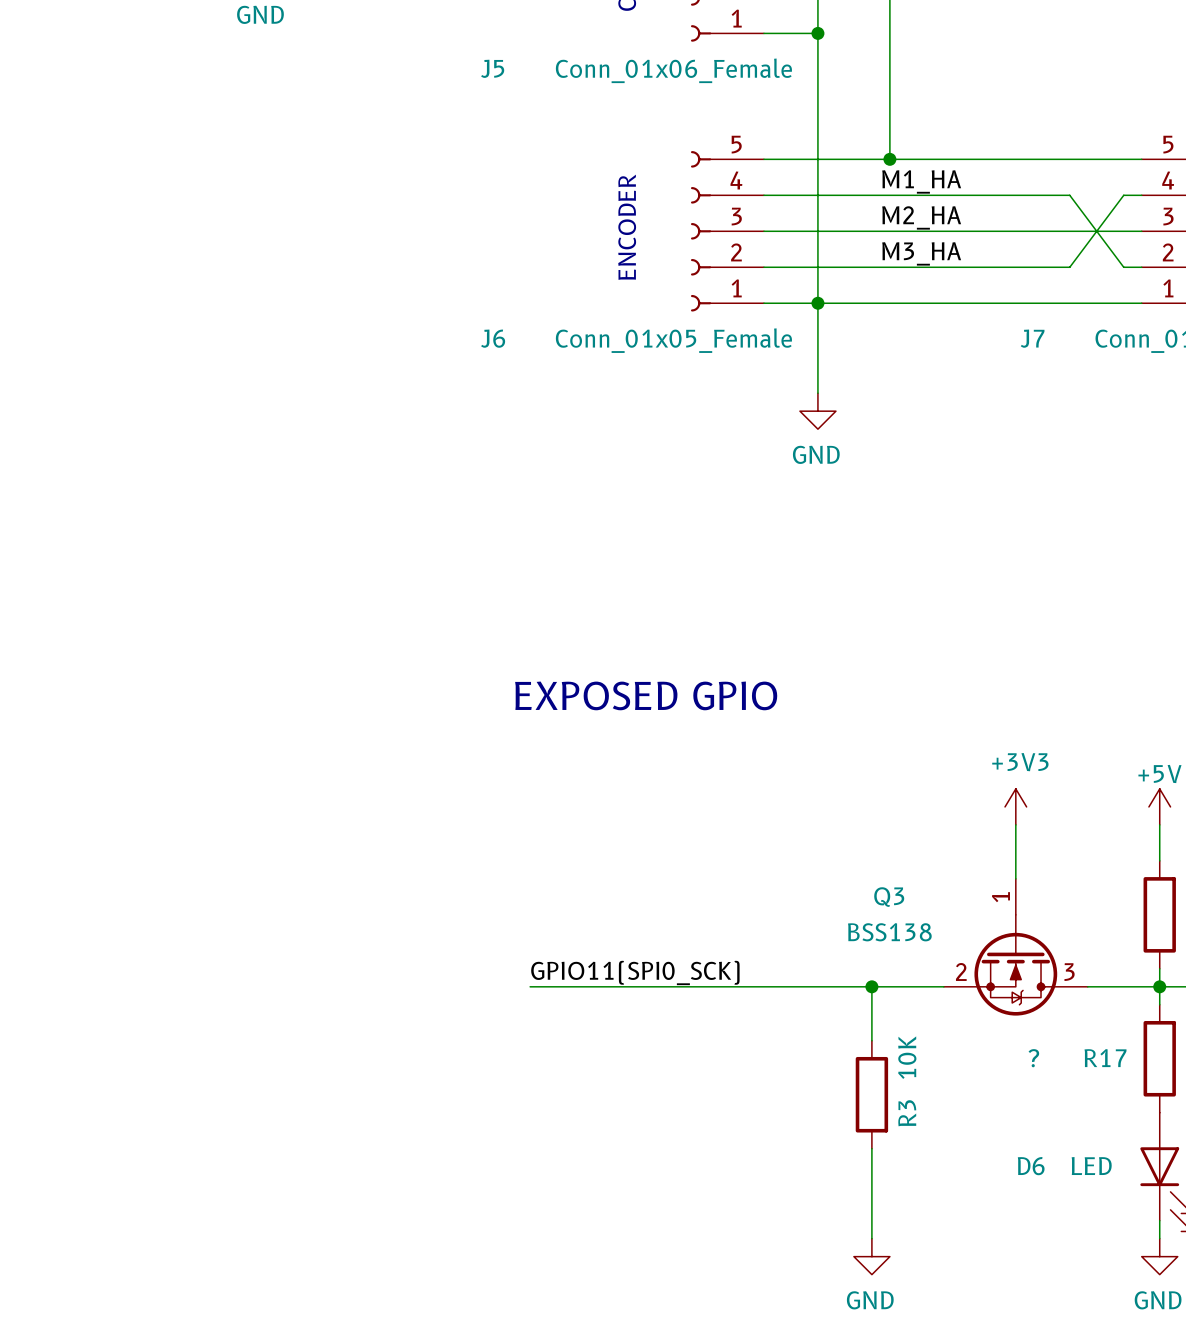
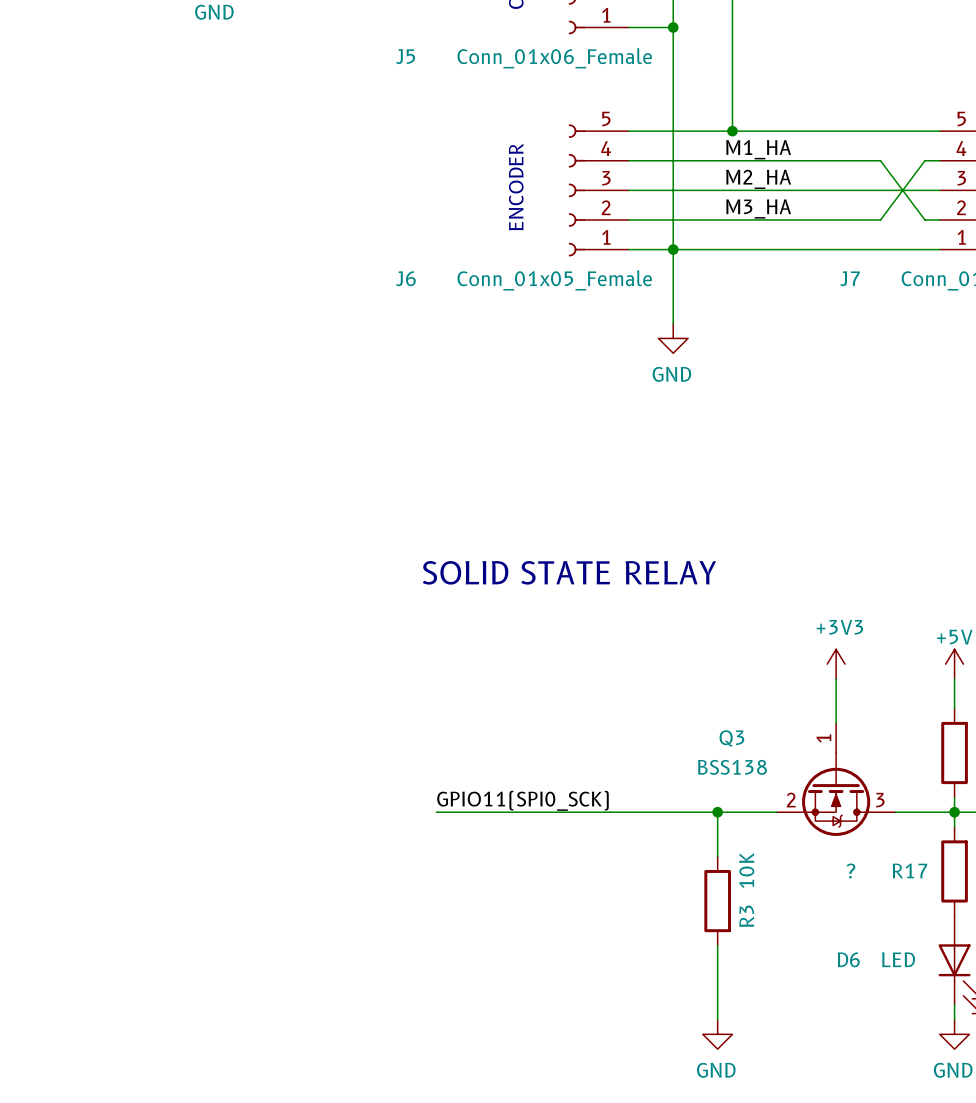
text: EXPOSED GPIO (646, 695) -> SOLID STATE RELAY (569, 572)

